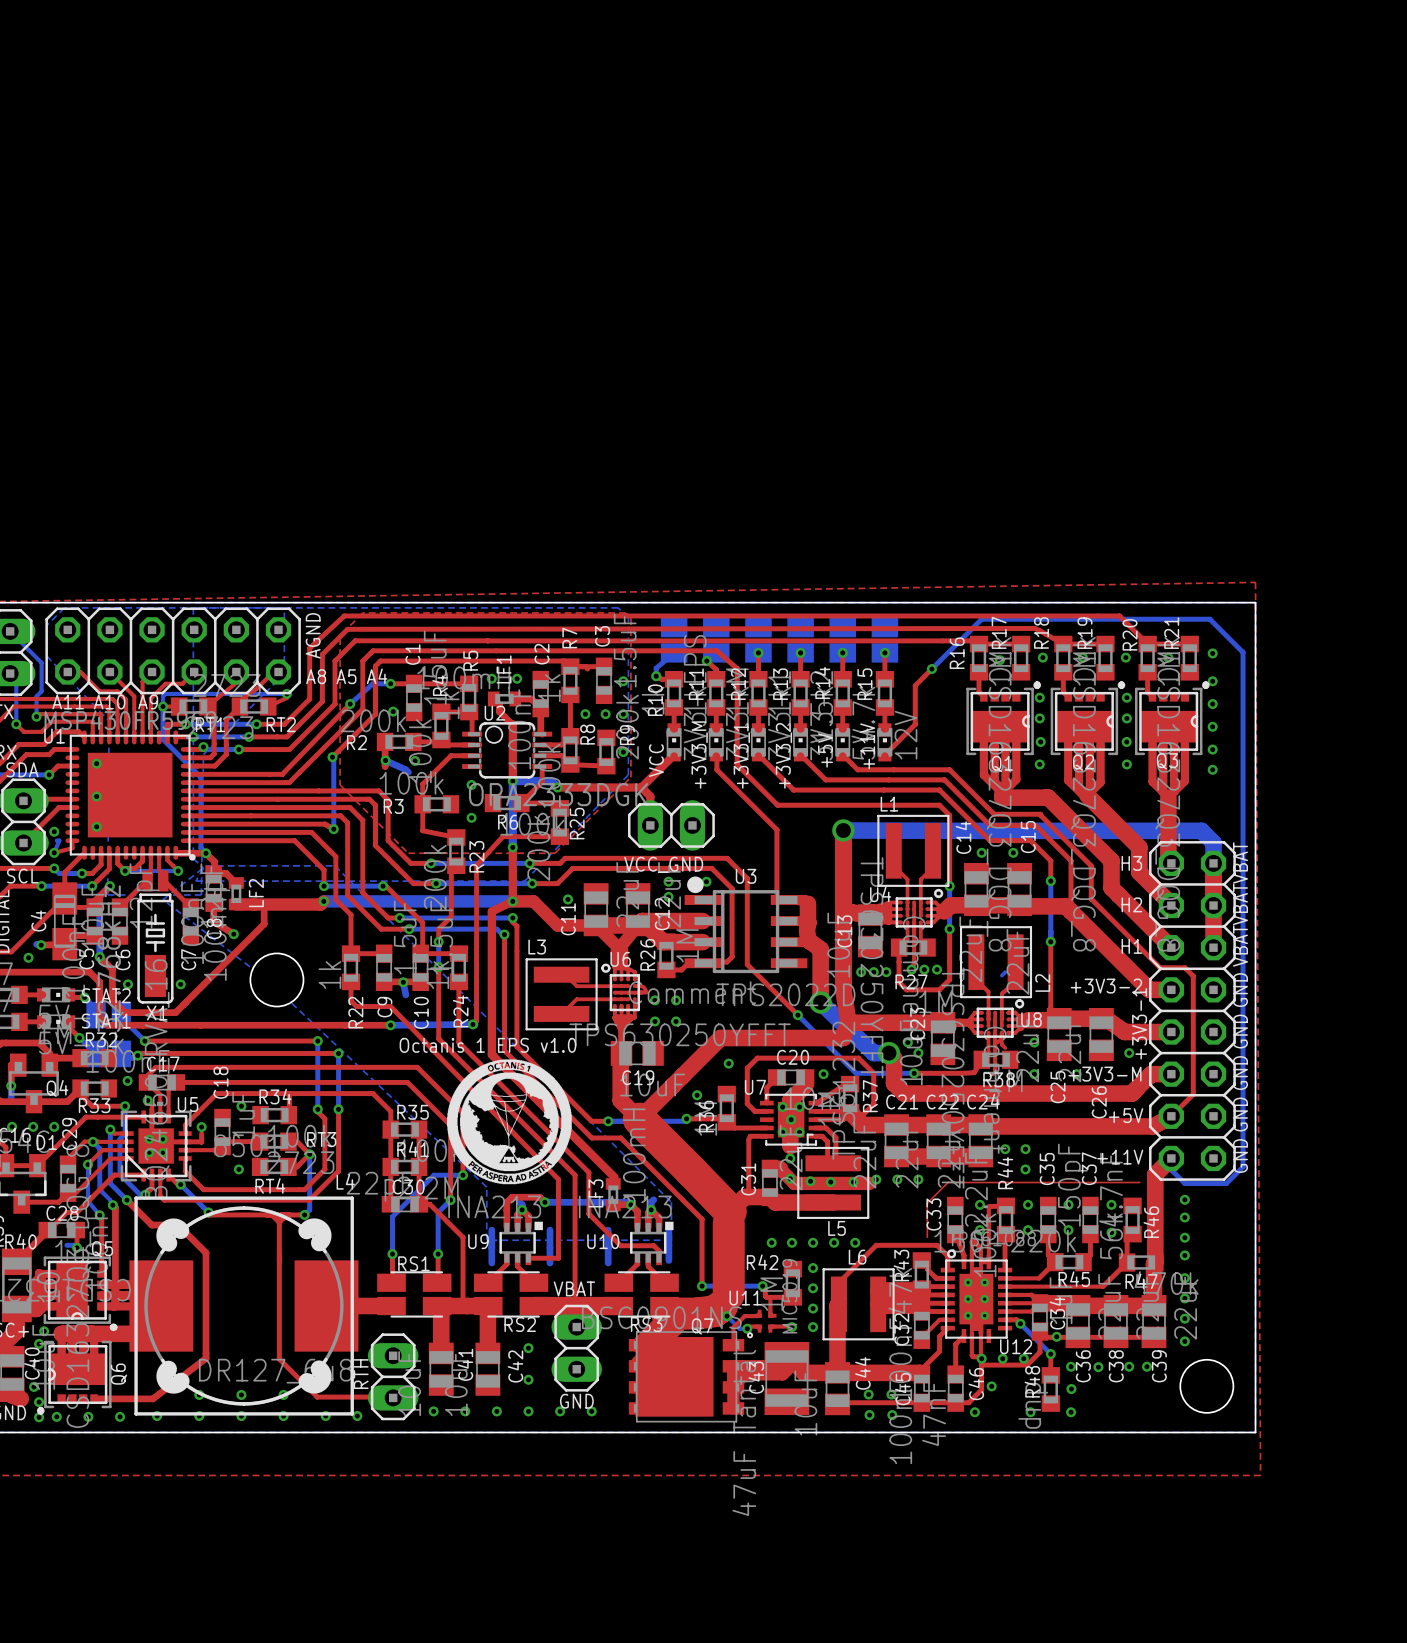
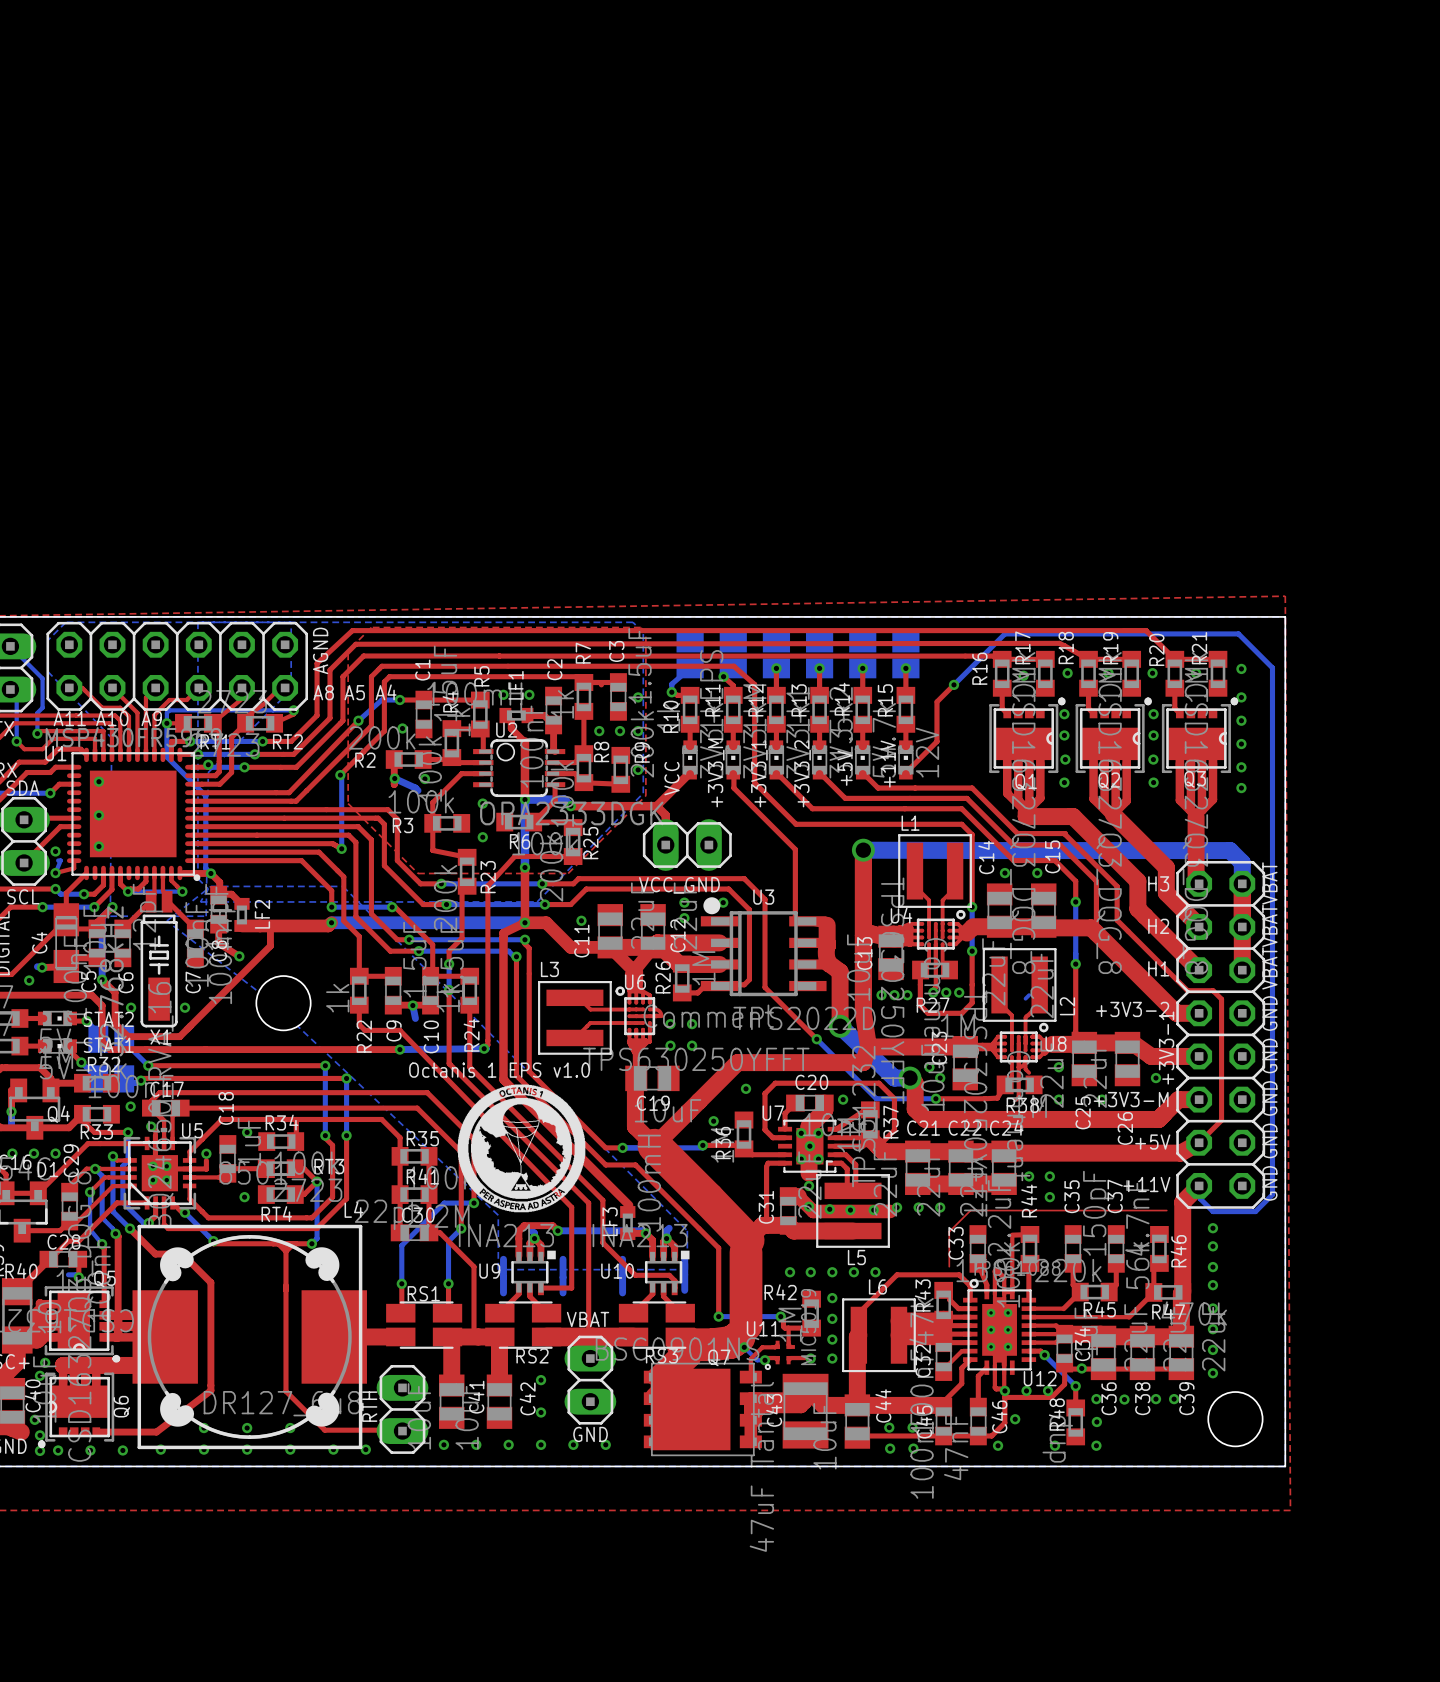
via: (979, 1204) -> none
via: (1028, 1204) -> none
via: (1068, 1204) -> none
via: (1111, 1204) -> none
via: (979, 1230) -> none
via: (1028, 1230) -> none
via: (1068, 1230) -> none
via: (1111, 1232) -> none

